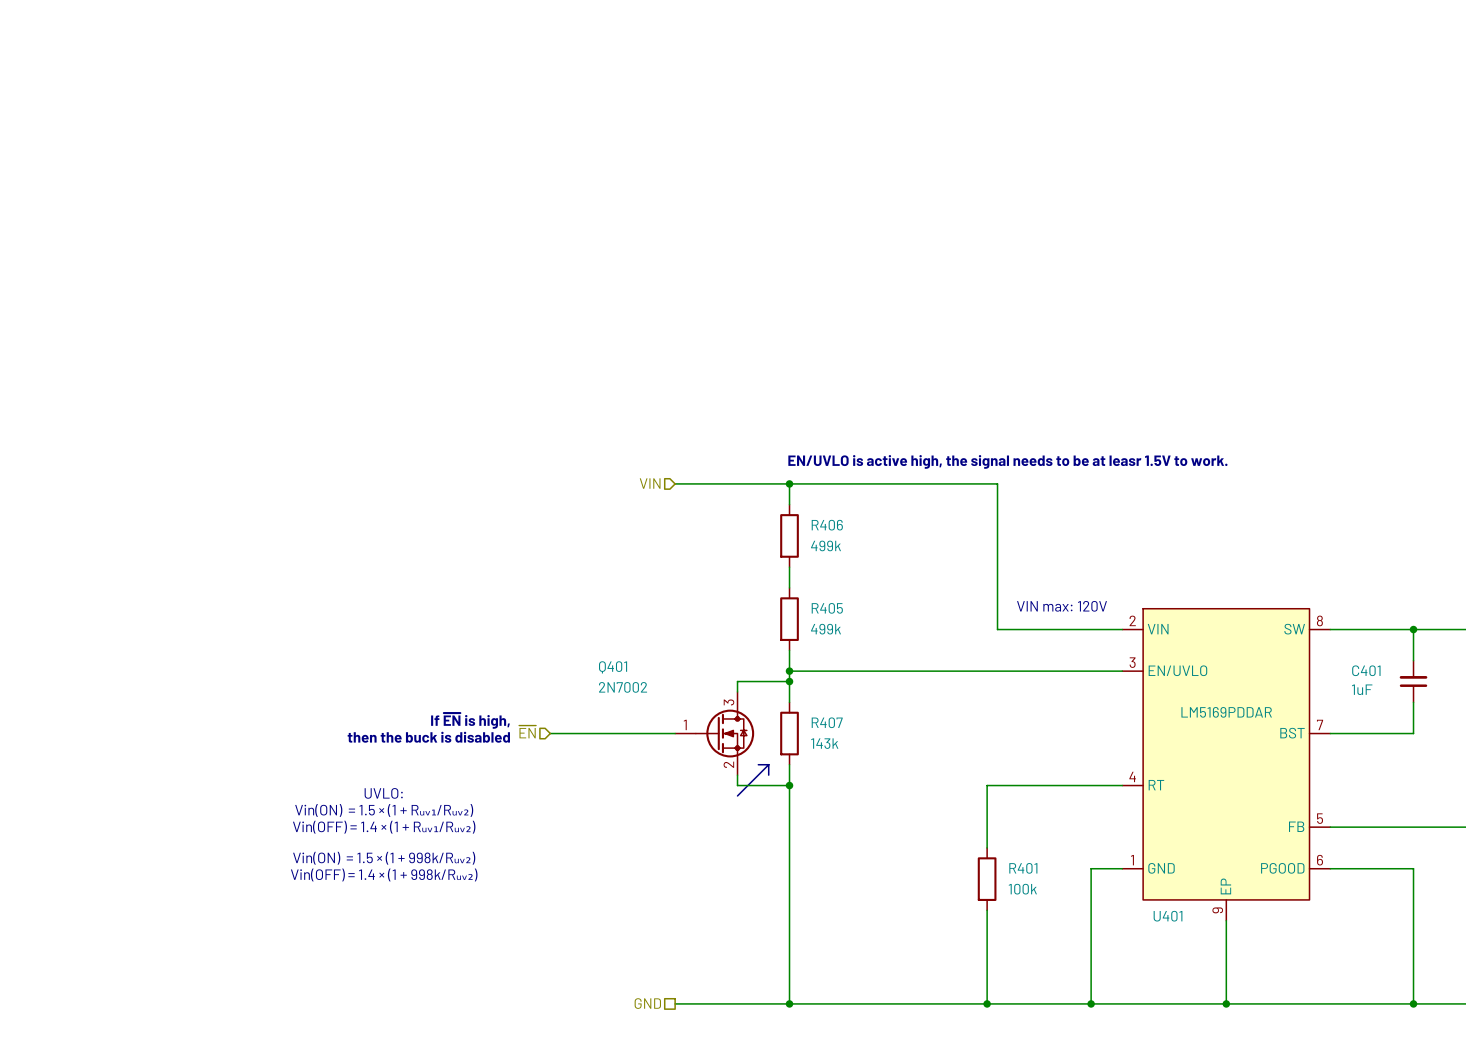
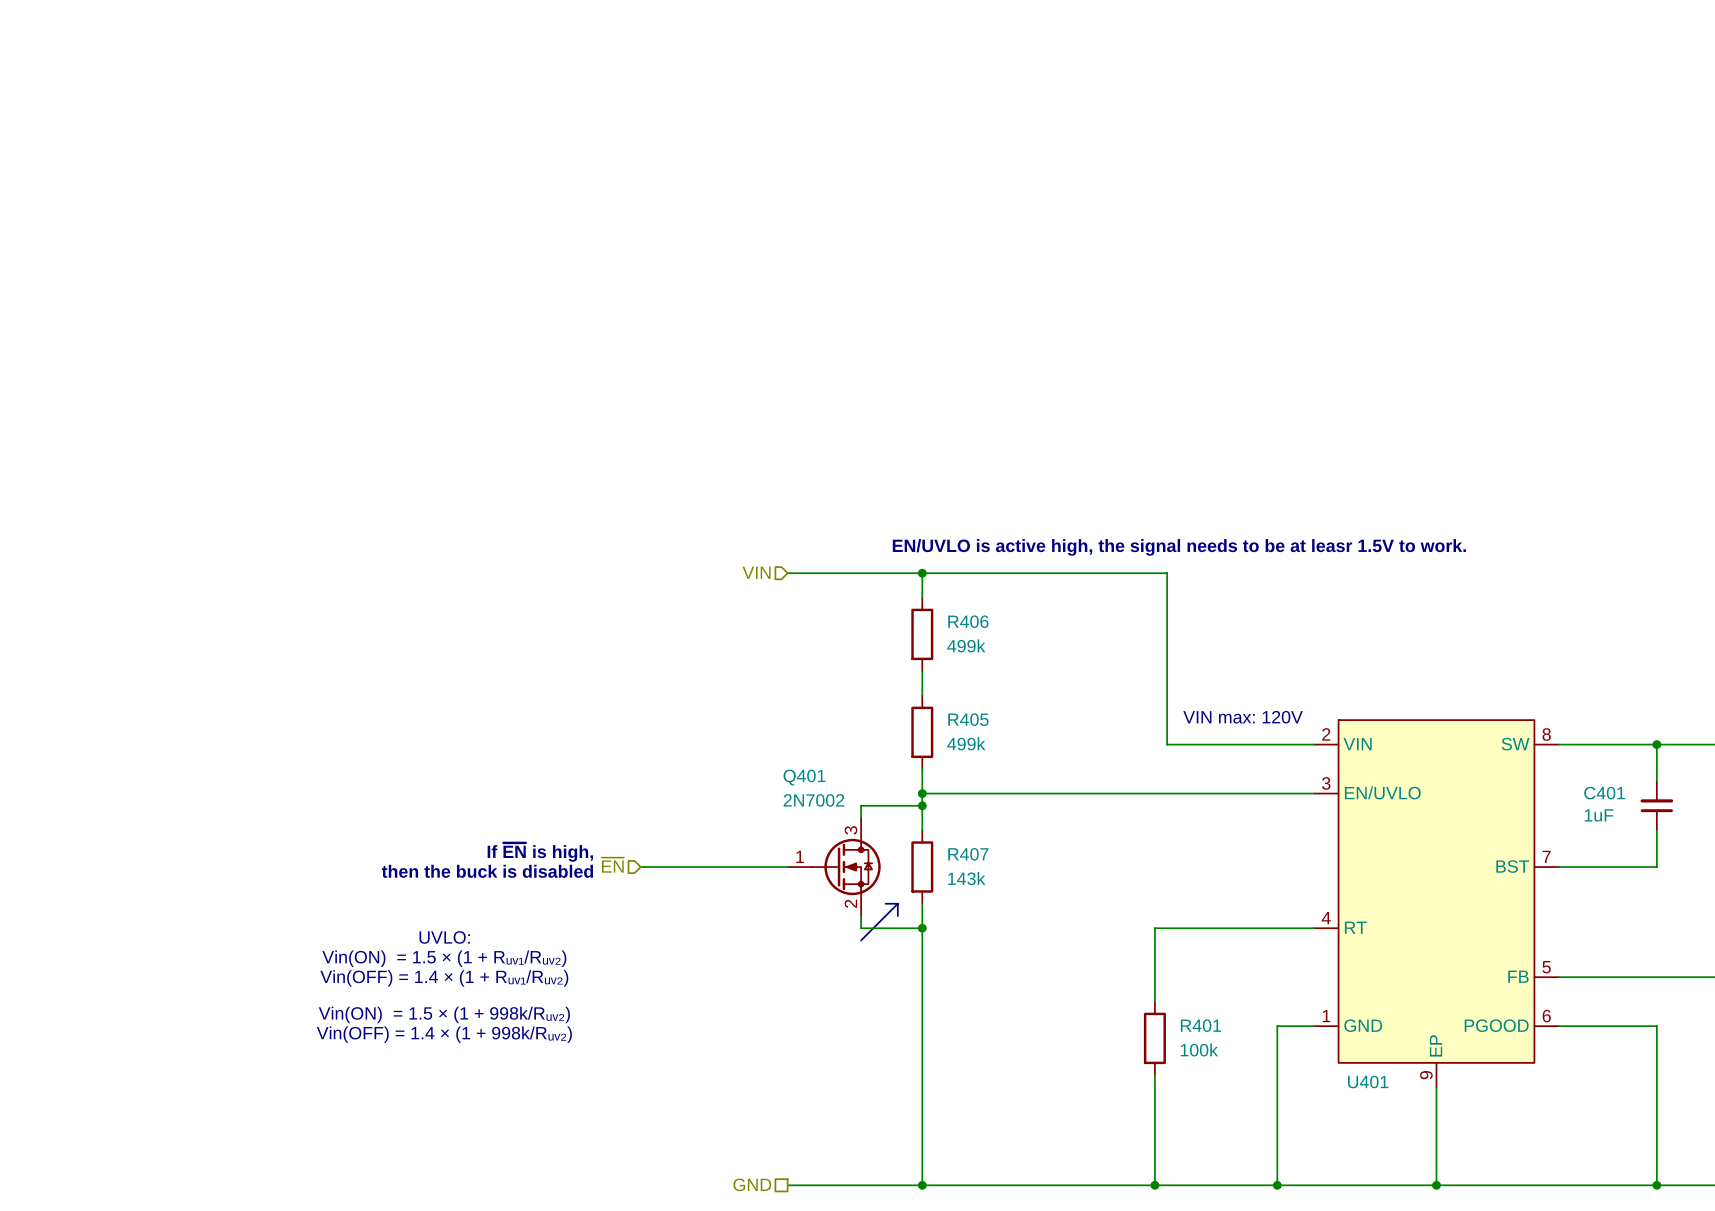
Q401 name position: Q401 (613, 667) -> Q401 (804, 777)
Q401 value position: 2N7002 (623, 687) -> 2N7002 (813, 800)
U401 value: LM5169PDDAR (1226, 712) -> none

